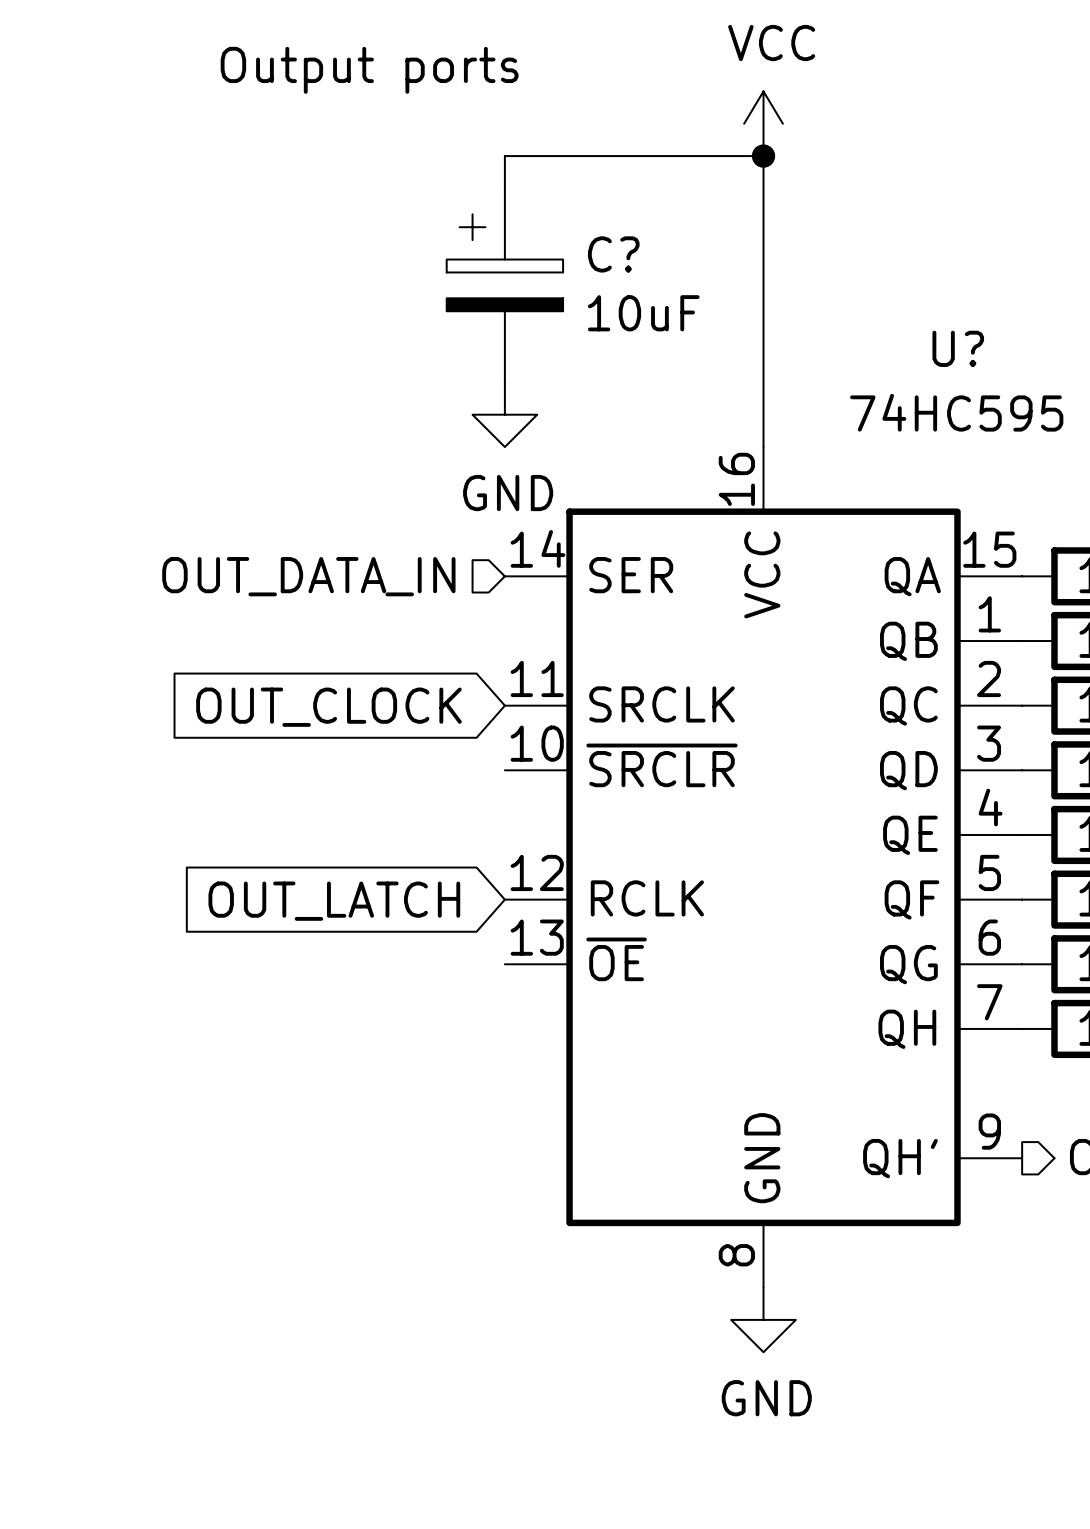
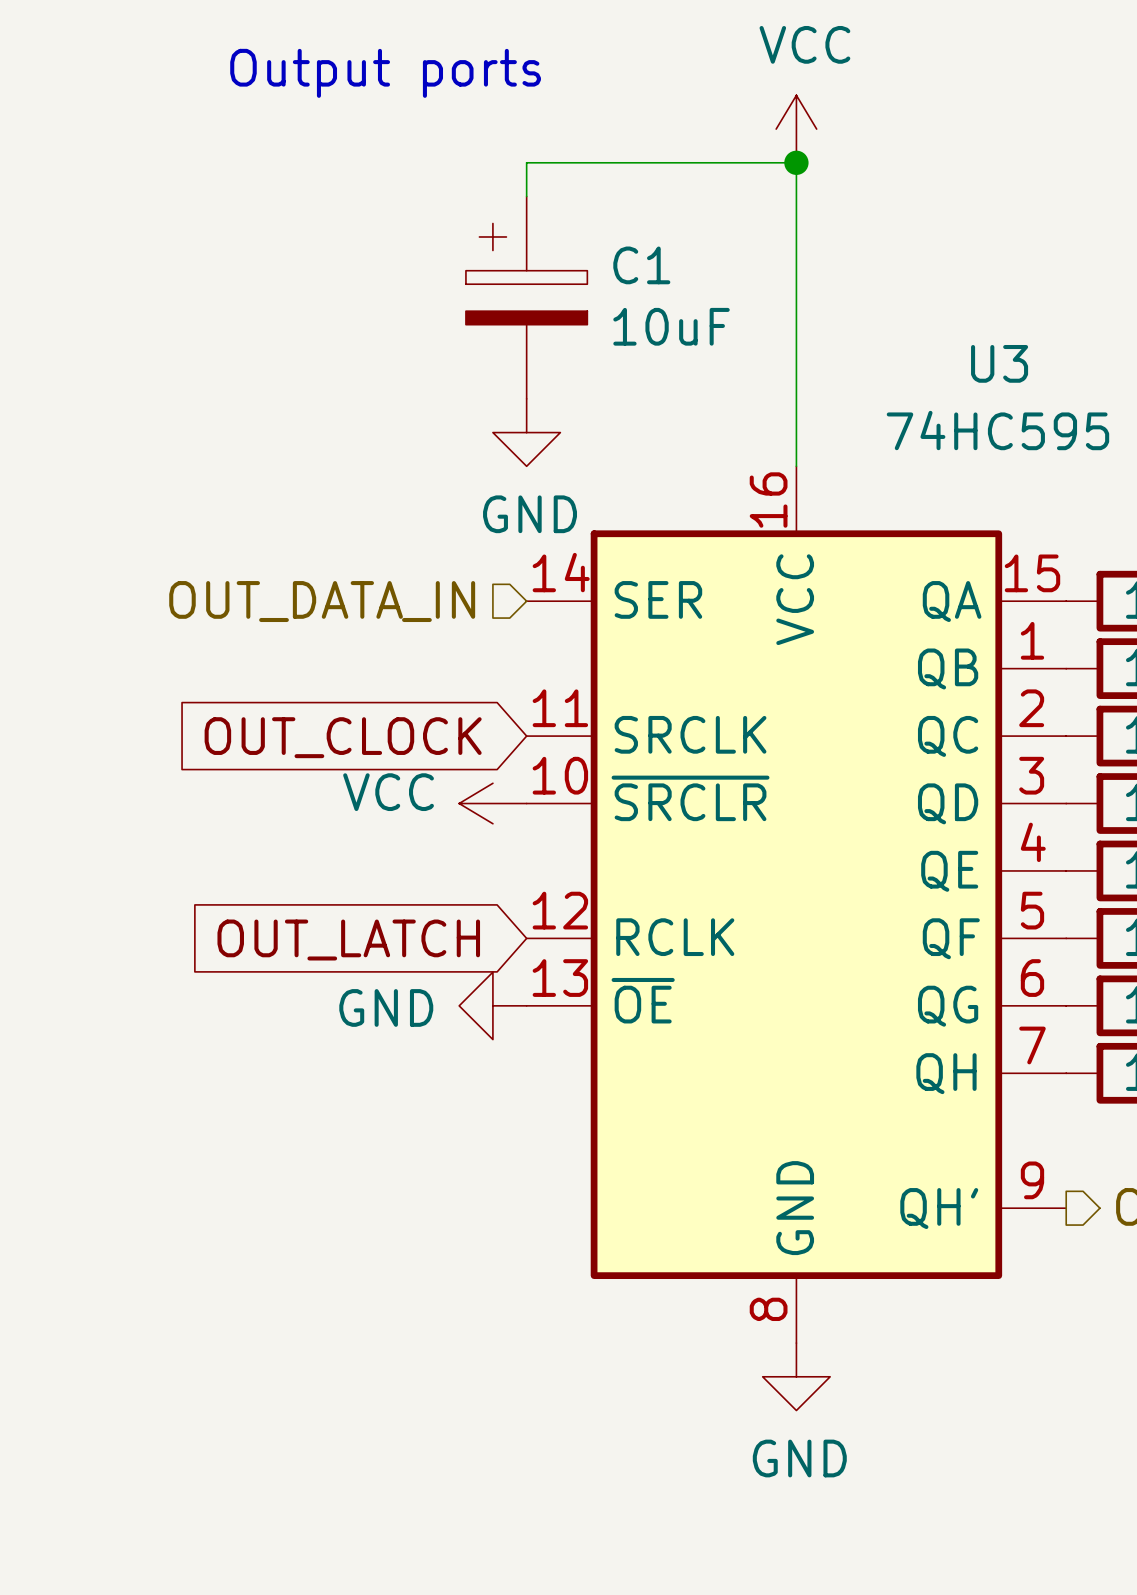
C? name: C? (613, 254) -> C1 (641, 265)
U? name: U? (958, 348) -> U3 (999, 363)
power symbol: none -> VCC (492, 803)
power symbol: none -> GND (492, 1005)

